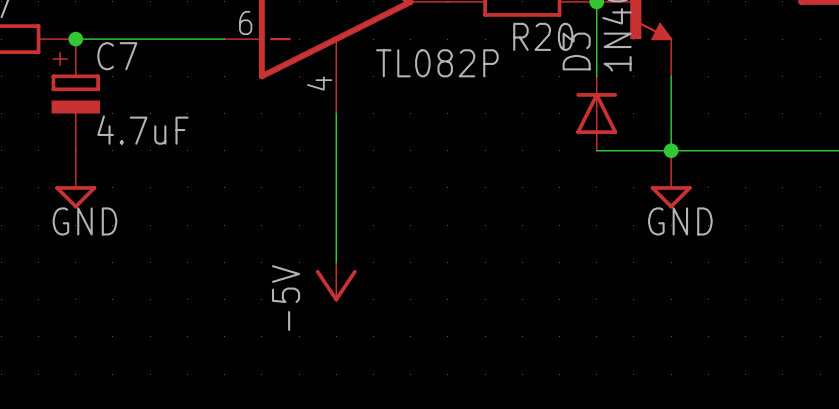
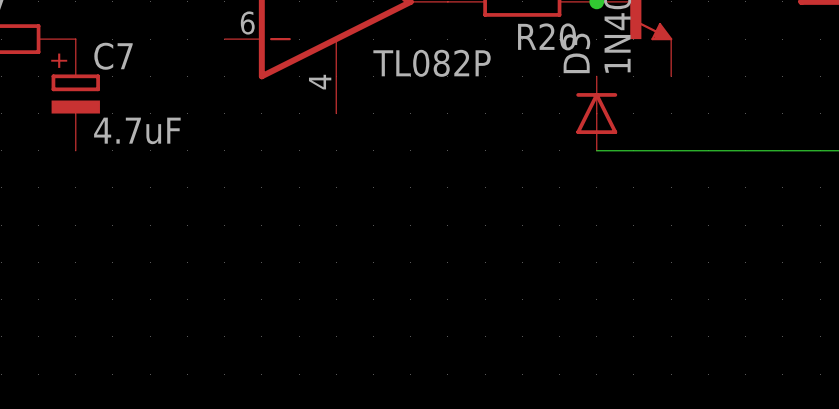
wire: (596, 1) (596, 76) -> none
wire: (75, 39) (224, 39) -> none
junction: (75, 39) -> none
wire: (671, 76) (671, 150) -> none
wire: (336, 113) (336, 262) -> none
junction: (671, 150) -> none
power symbol: GND (75, 179) -> none
power symbol: GND (671, 179) -> none
power symbol: -5V (336, 281) -> none

